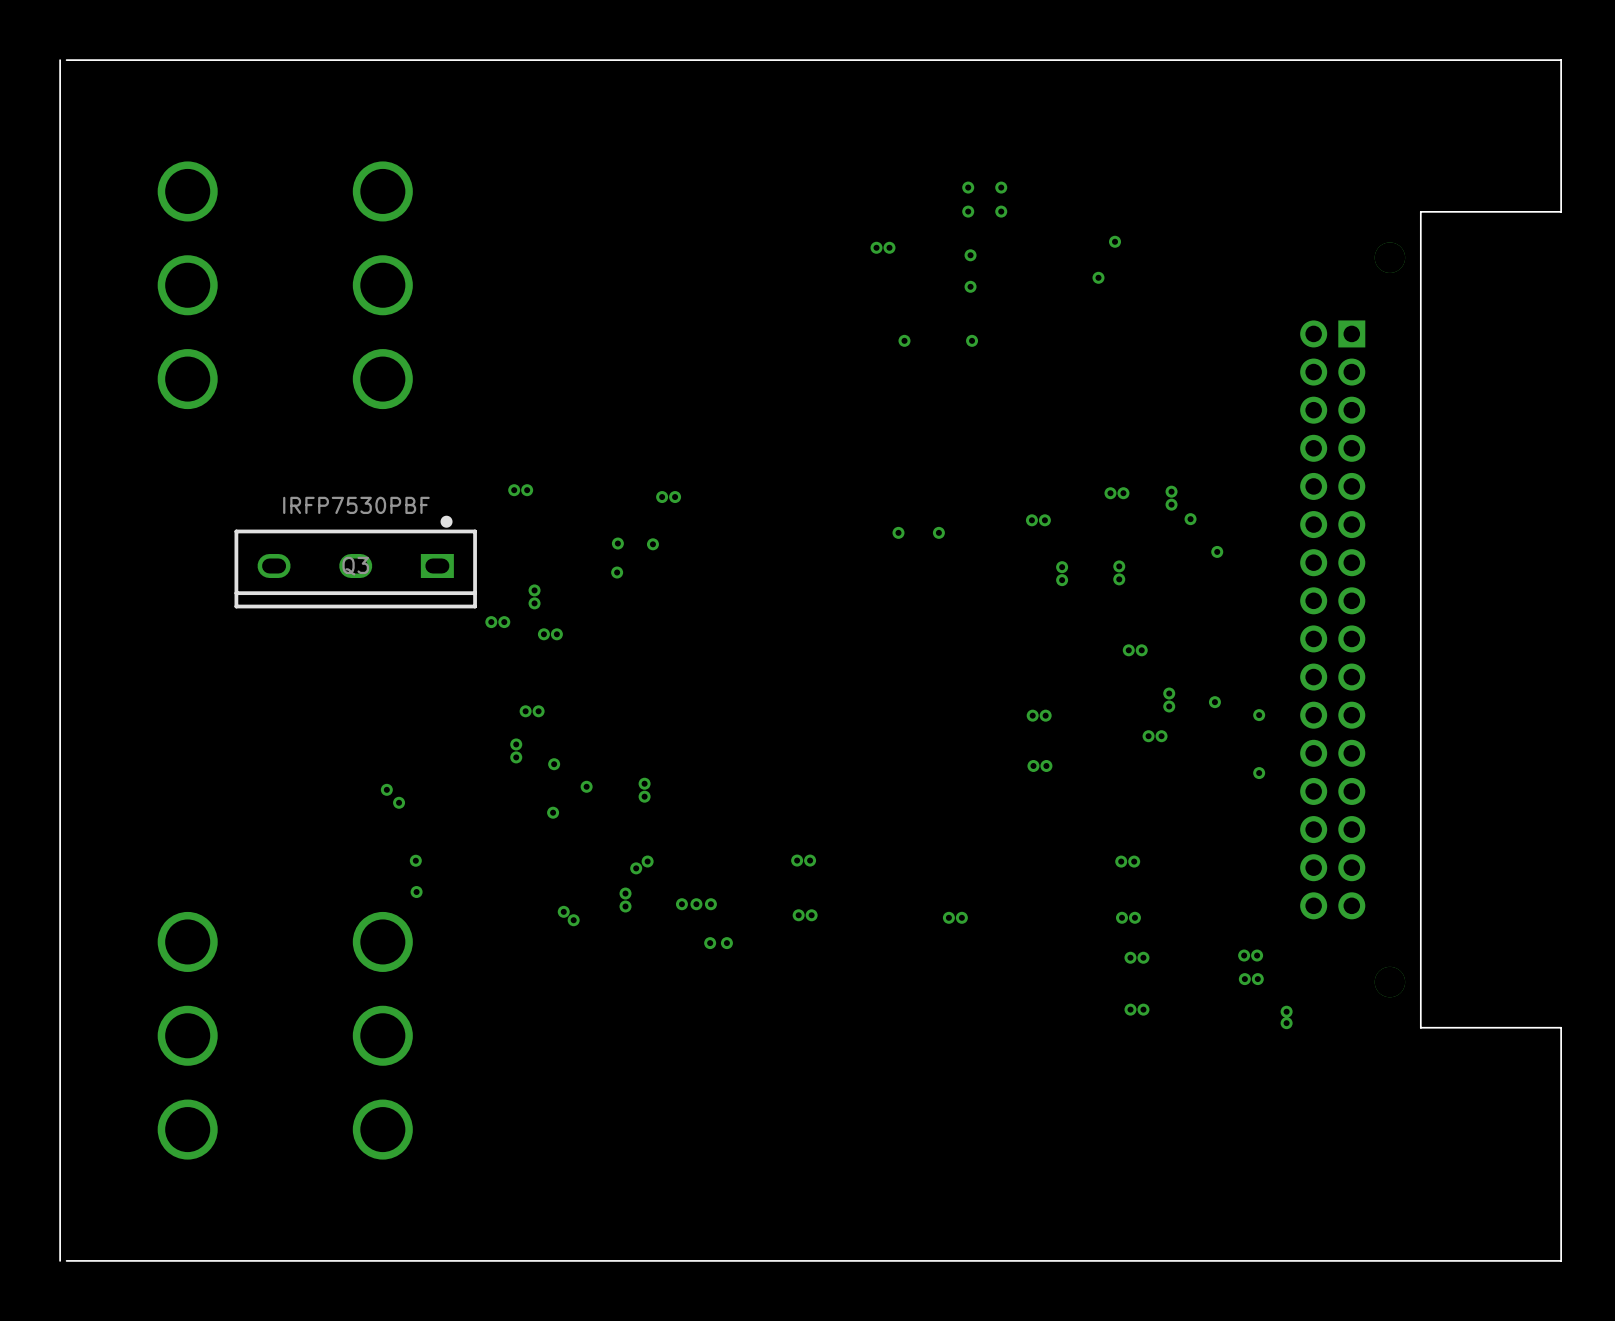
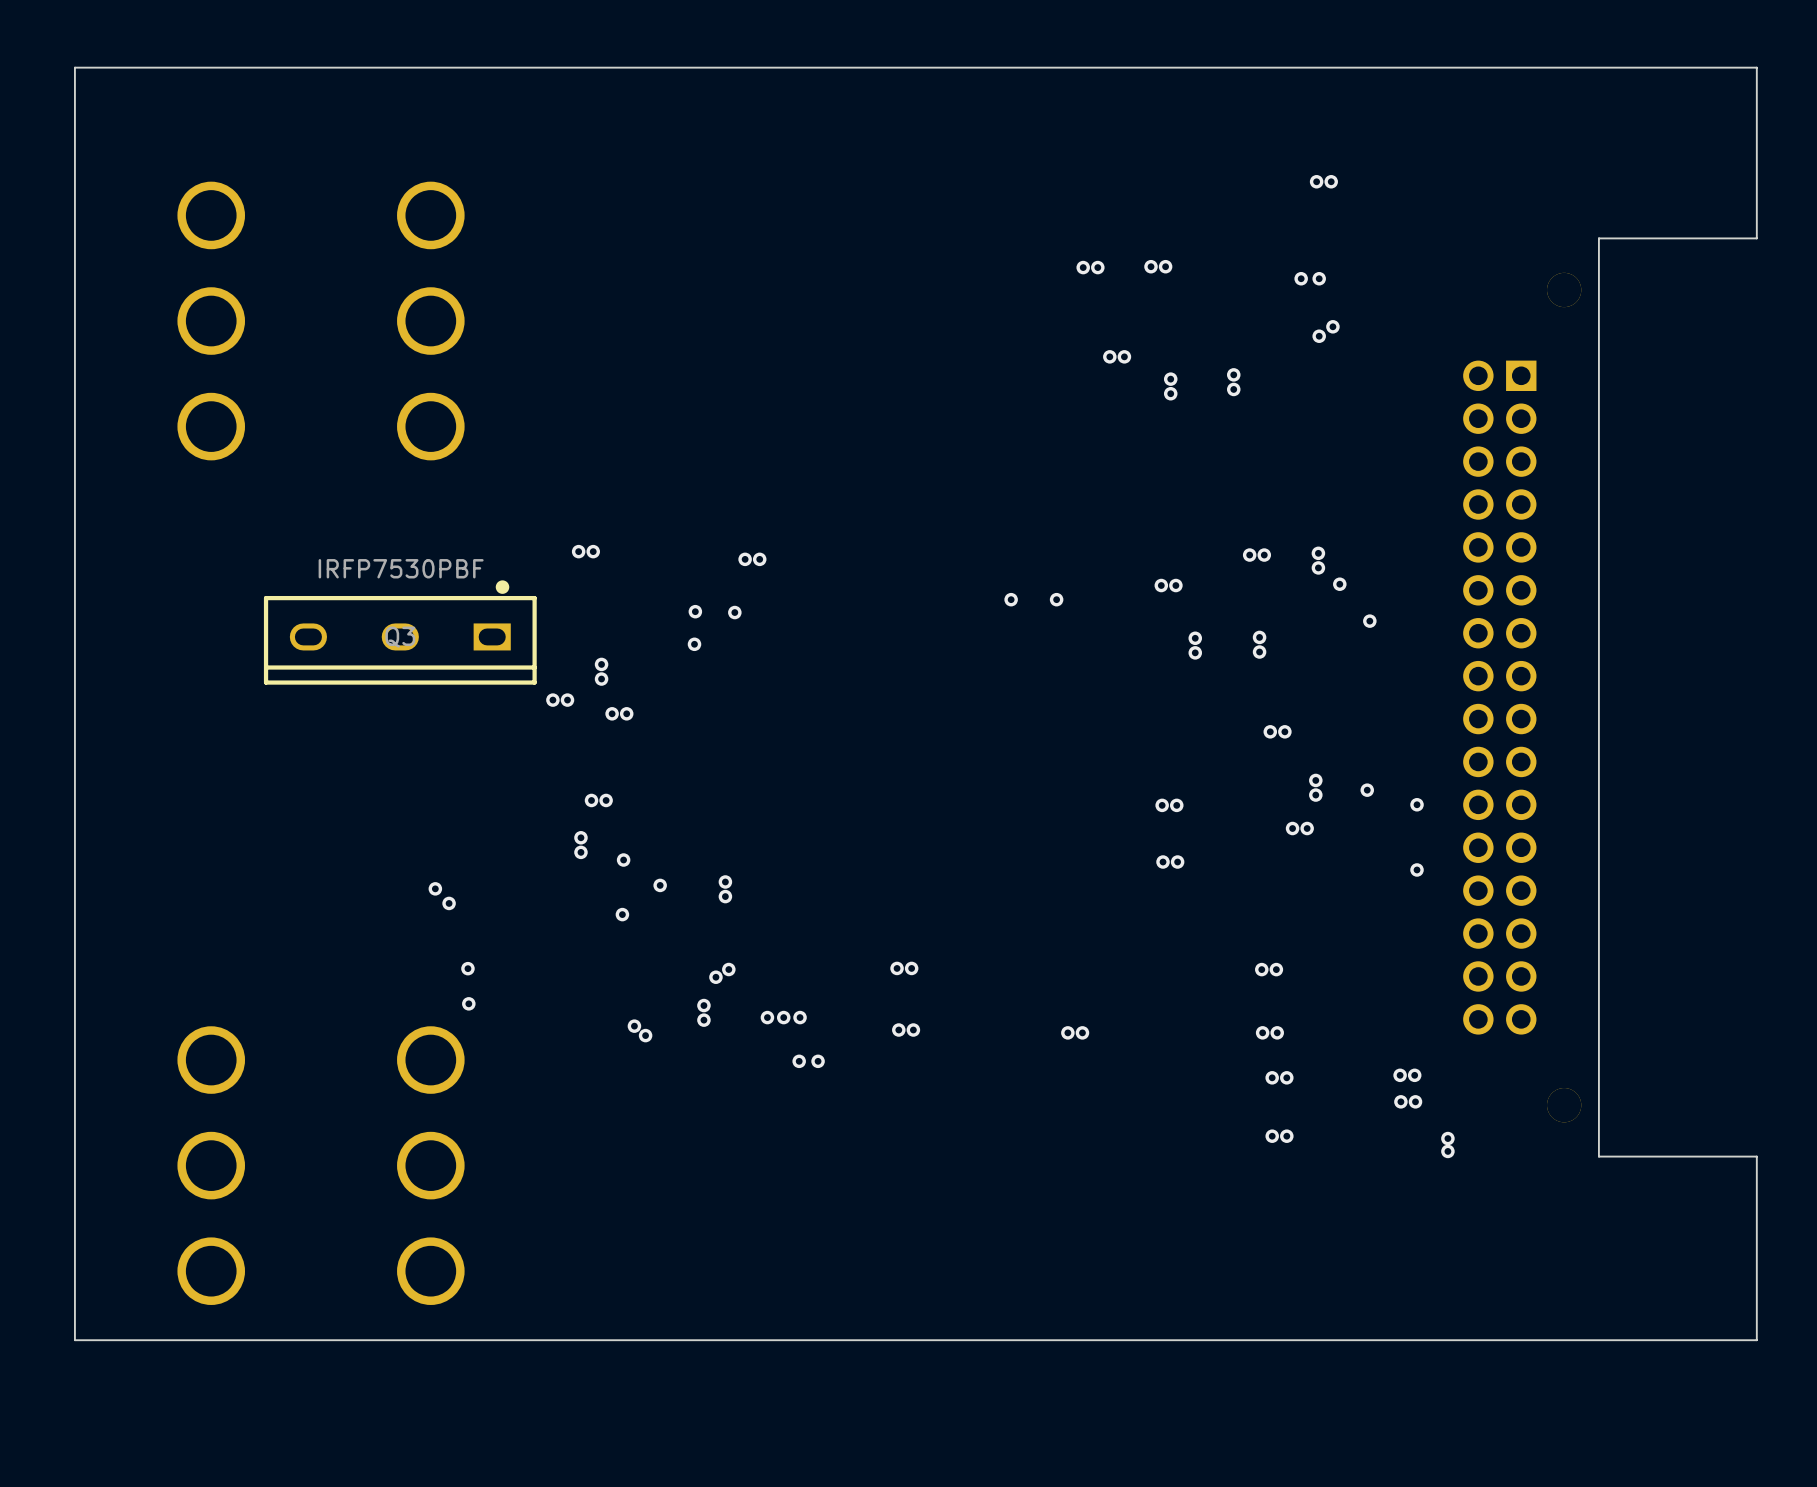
board edge: (60, 60) (60, 1260) -> none
via: none -> (1316, 181)
via: none -> (1331, 181)
via: (968, 187) -> none
via: (1001, 187) -> none
via: (968, 211) -> none
via: (1001, 211) -> none
via: none -> (1083, 267)
via: none -> (1097, 267)
via: none -> (1151, 266)
via: none -> (1165, 266)
via: (1115, 241) -> none
via: (876, 247) -> none
via: (889, 247) -> none
via: none -> (1301, 278)
via: none -> (1319, 278)
via: (970, 255) -> none
via: (1098, 277) -> none
via: (970, 286) -> none
via: none -> (1332, 326)
via: none -> (1319, 336)
via: none -> (1109, 356)
via: none -> (1124, 356)
via: none -> (1233, 374)
via: none -> (1170, 379)
via: (904, 340) -> none
via: (972, 340) -> none
via: none -> (1233, 389)
via: none -> (1170, 393)
board edge: (1561, 1190) (1561, 1260) (66, 1260) -> (1756, 1340) (74, 1340) (74, 67)

